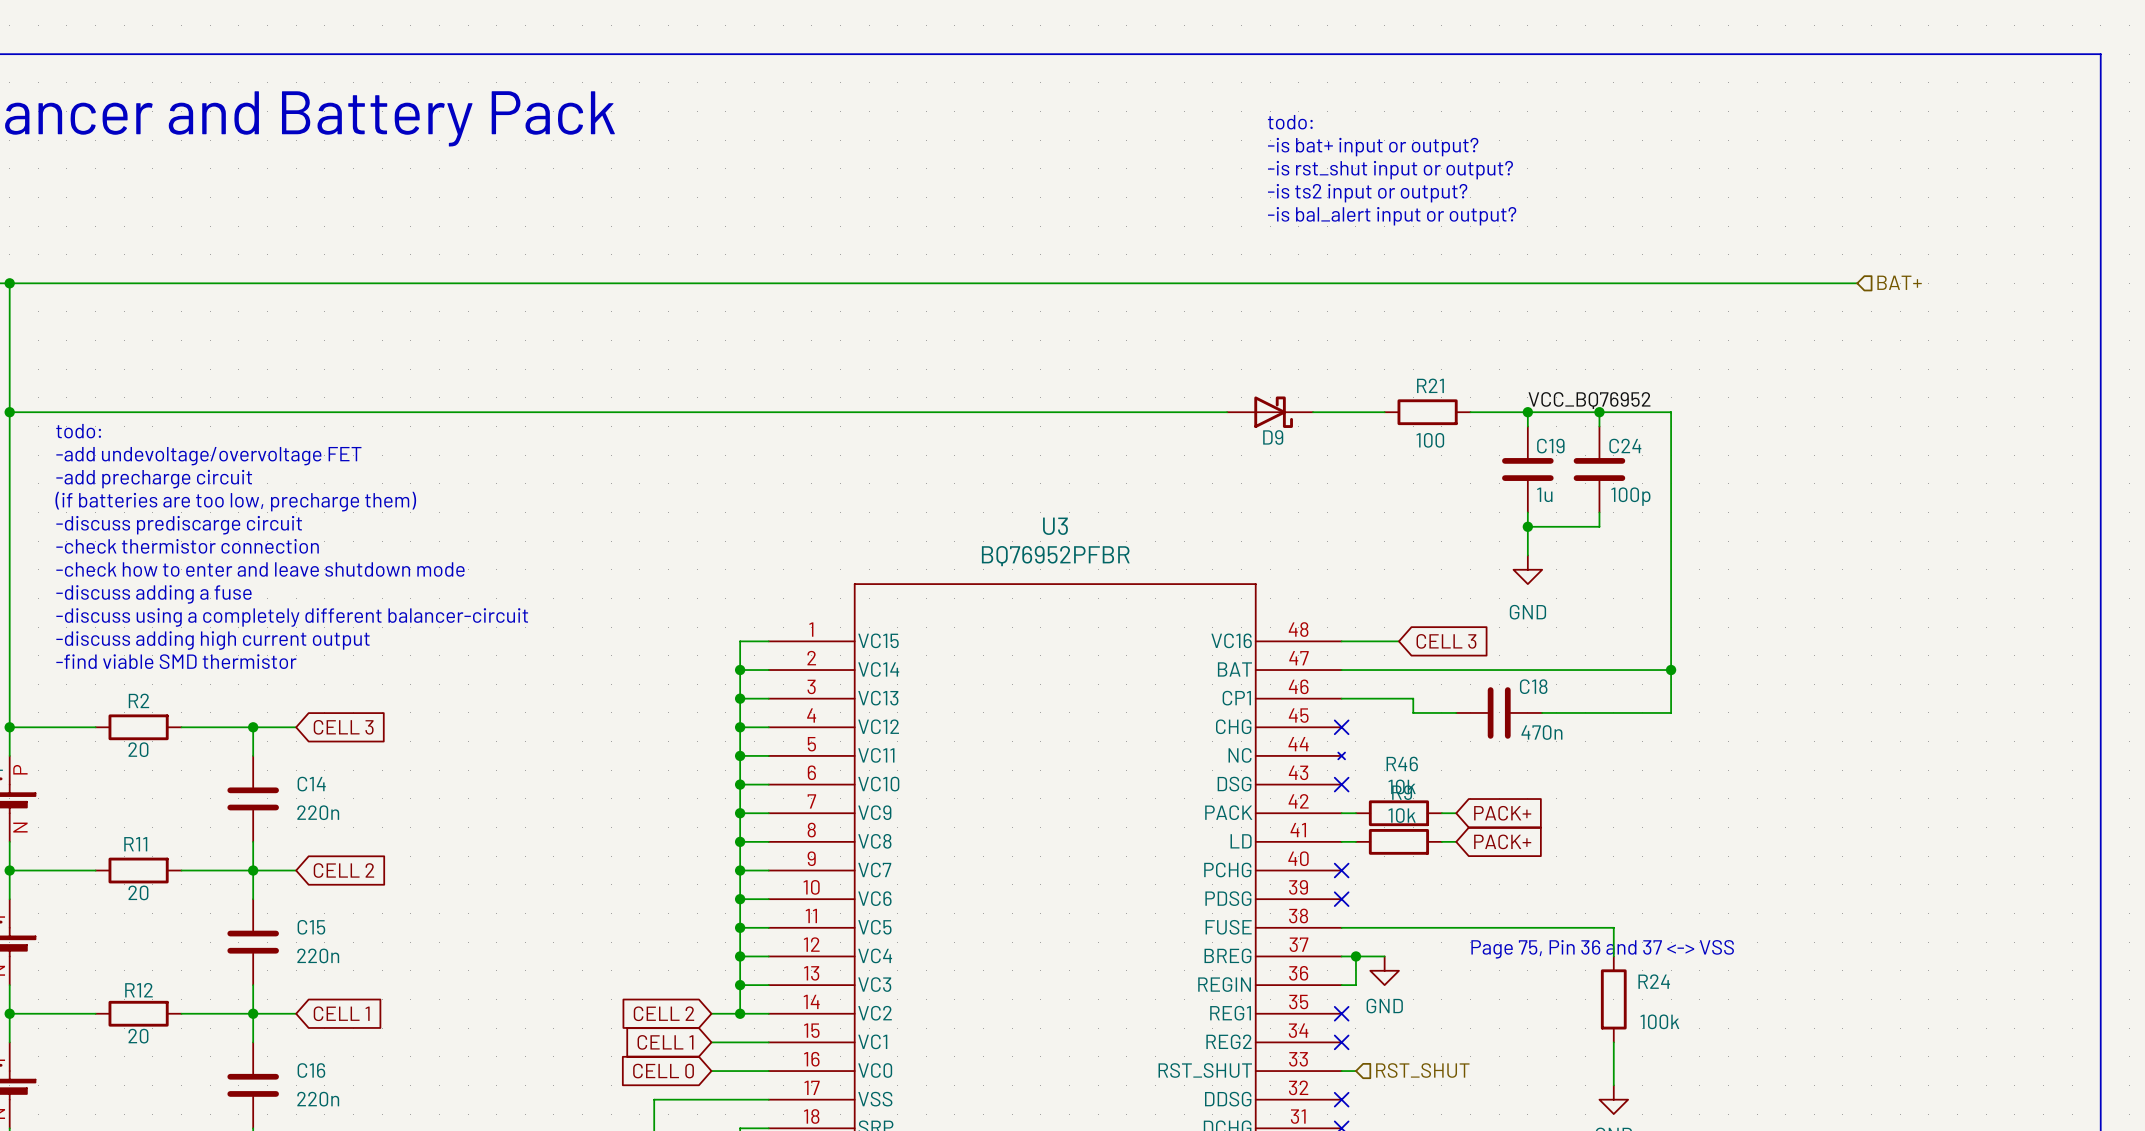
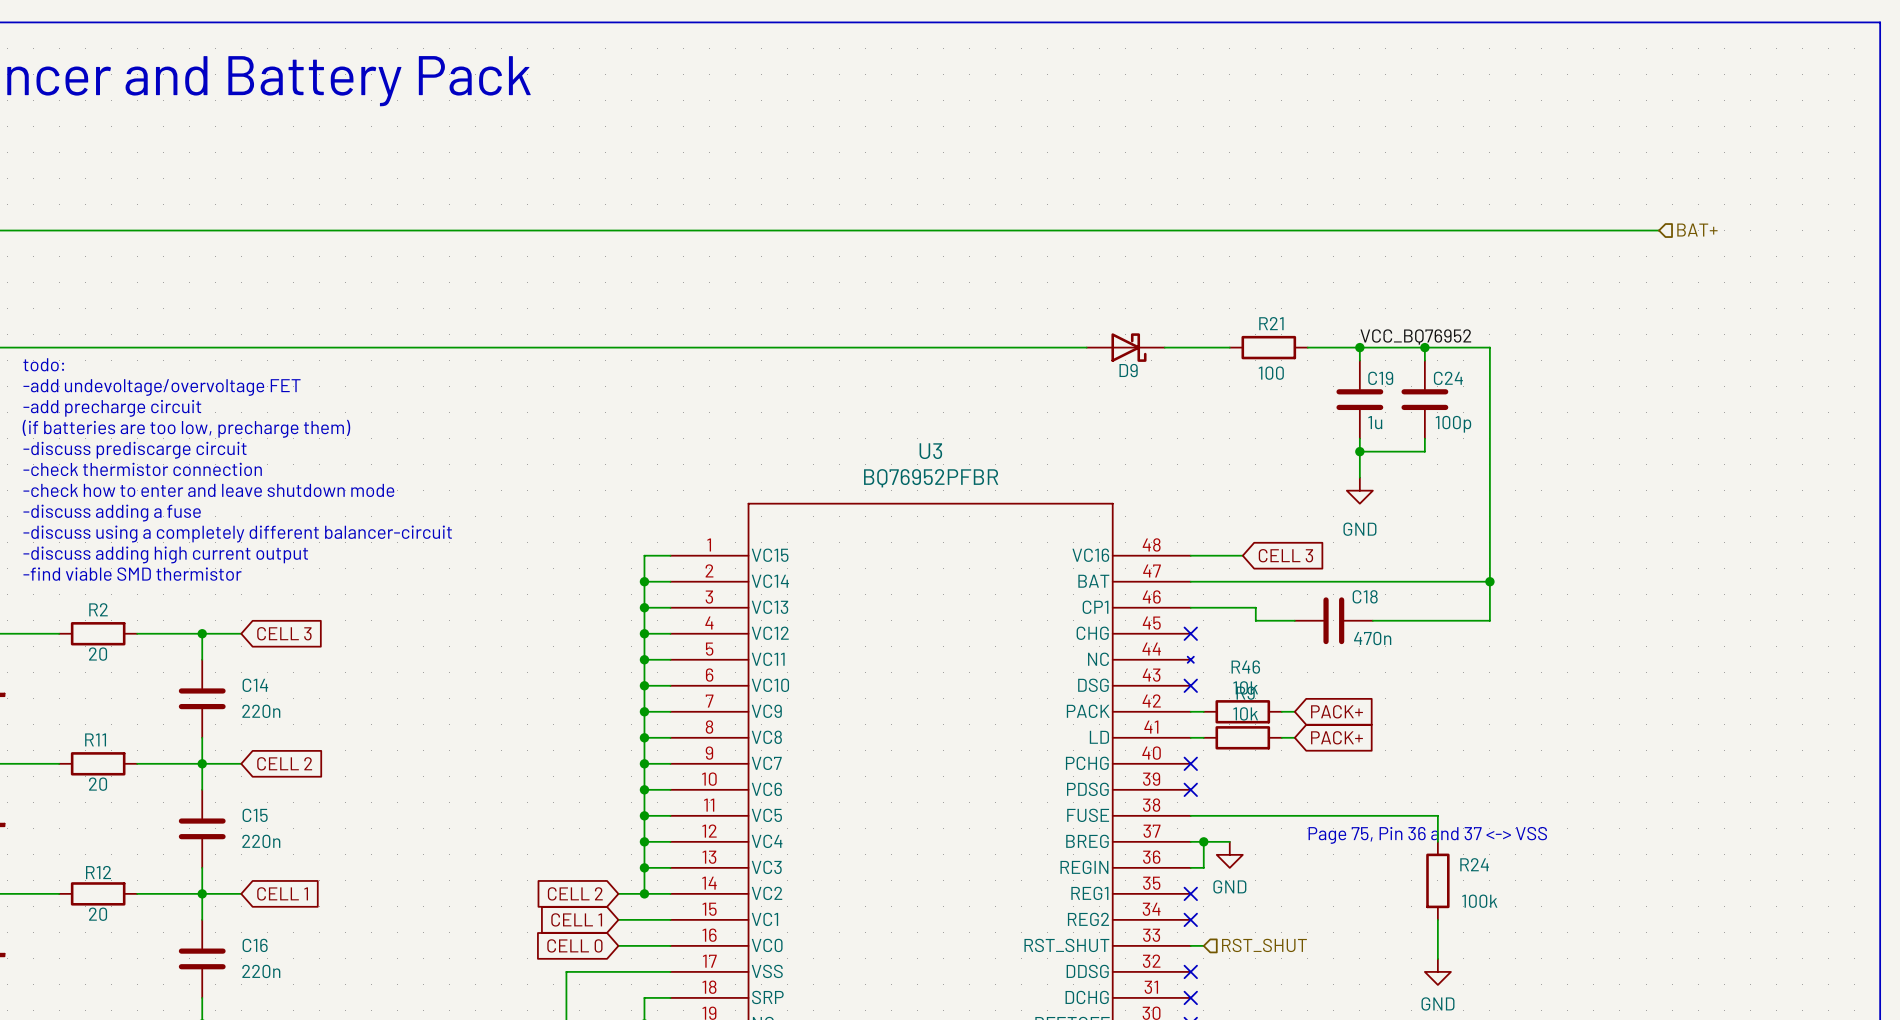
text: todo: (1290, 122) -> none
text: -is bat+ input or output? (1373, 147) -> none
text: -is rst_shut input or output? (1390, 170) -> none
text: -is ts2 input or output? (1367, 193) -> none
text: -is bal_alert input or output? (1392, 216) -> none

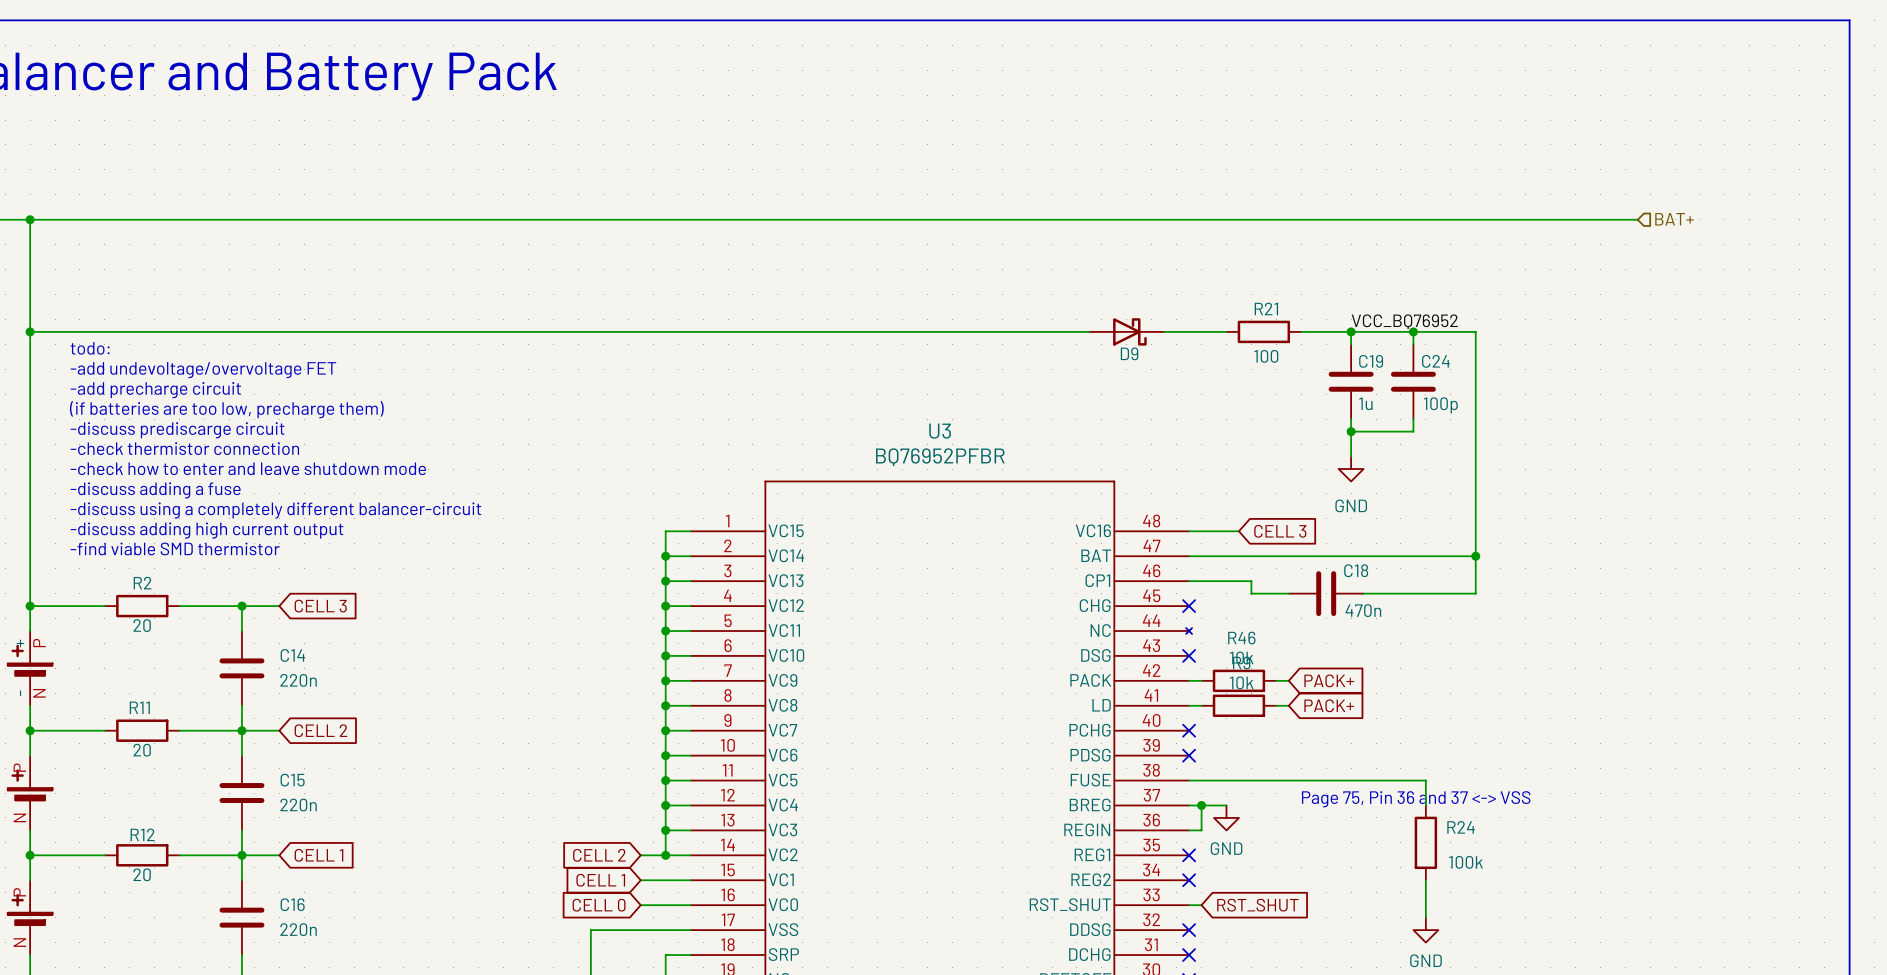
global label: none -> RST_SHUT (1257, 905)
hierarchical label: RST_SHUT (1264, 945) -> none

